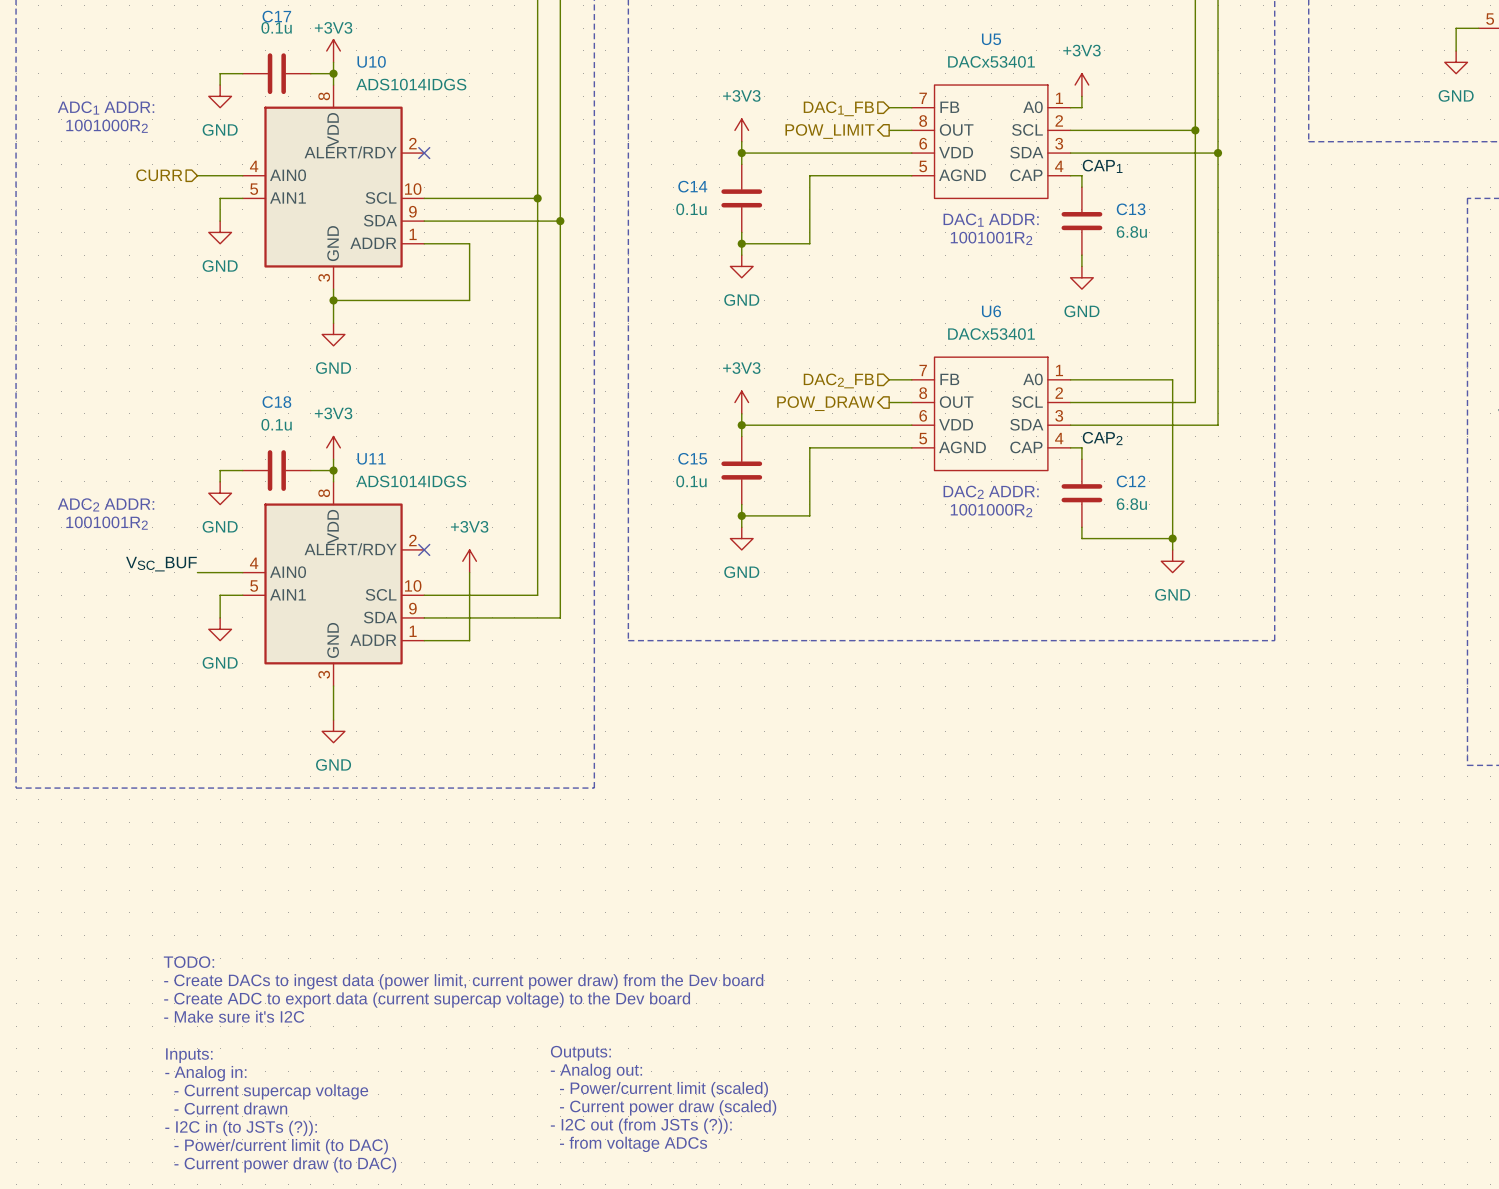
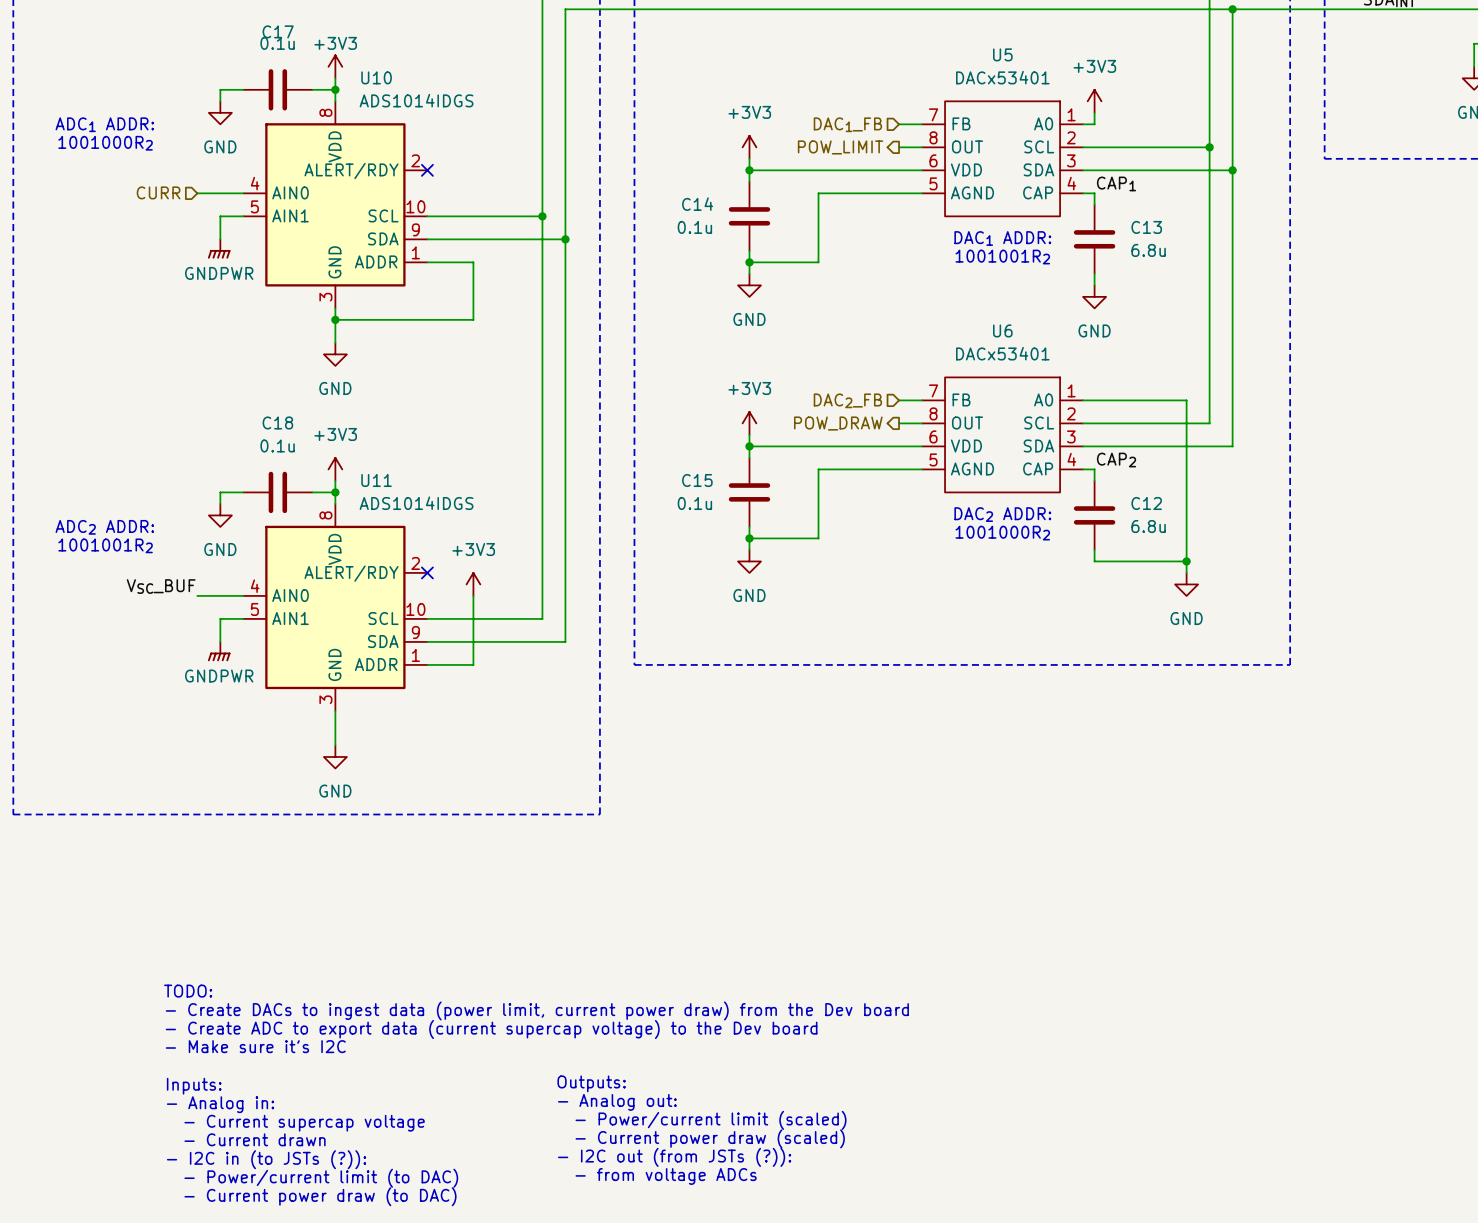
power symbol: GND (220, 232) -> GNDPWR (219, 249)
power symbol: GND (220, 629) -> GNDPWR (219, 651)

